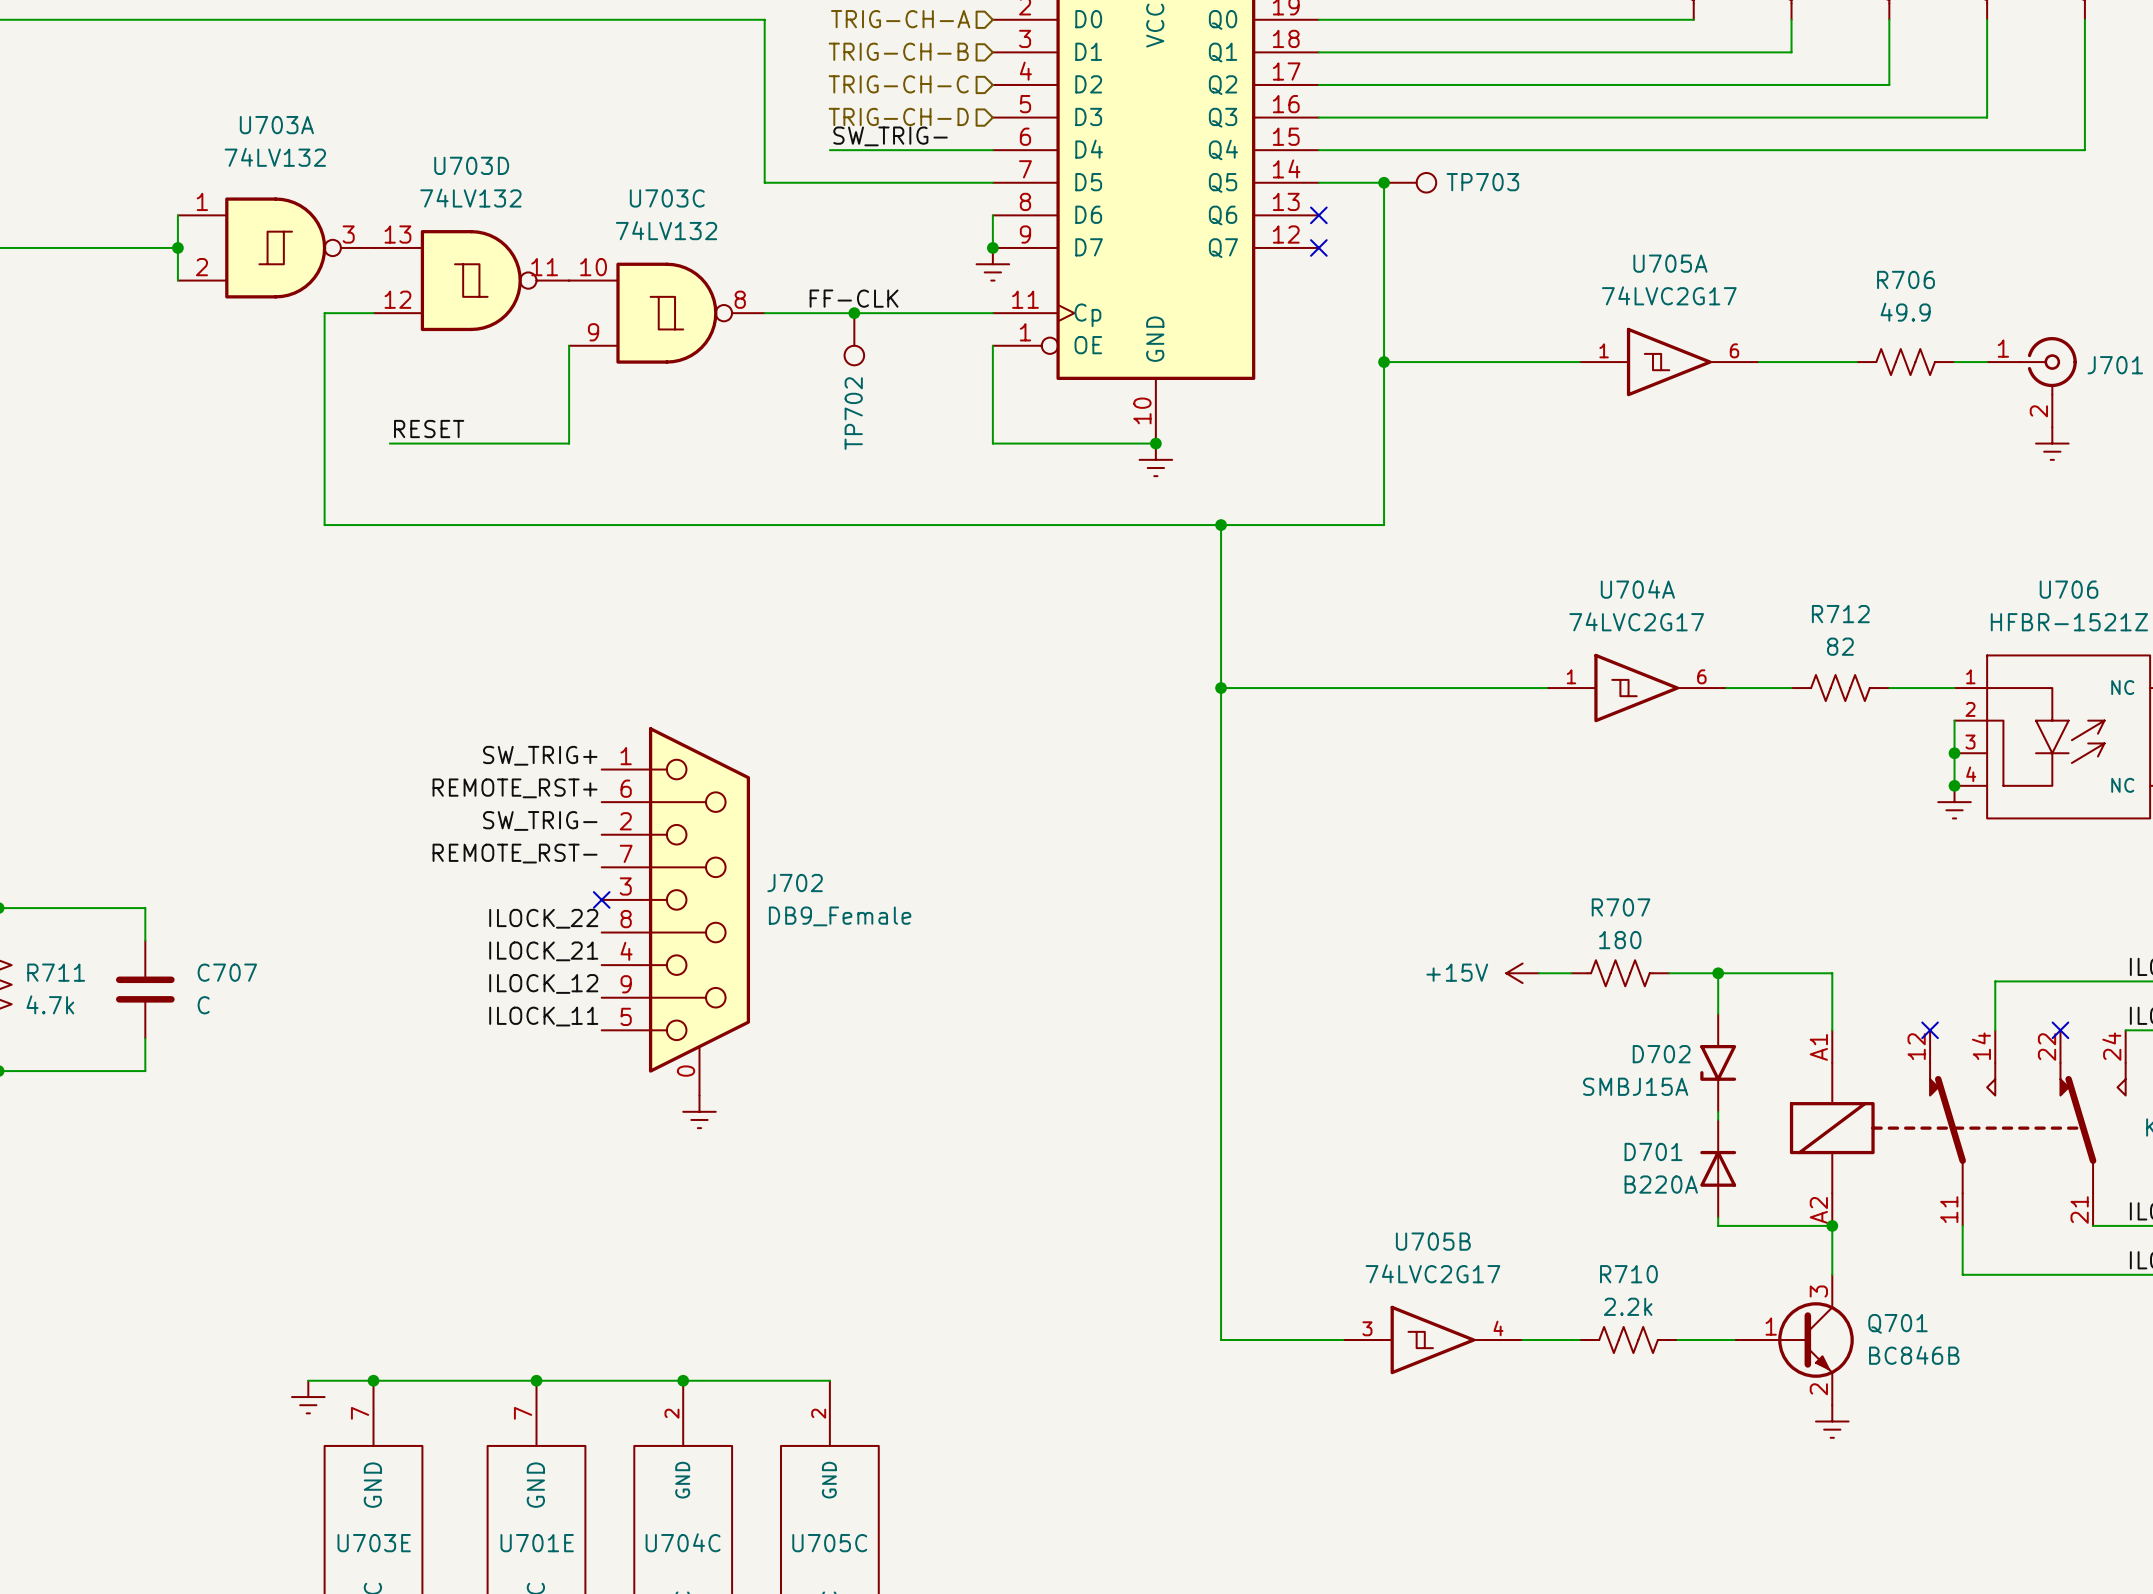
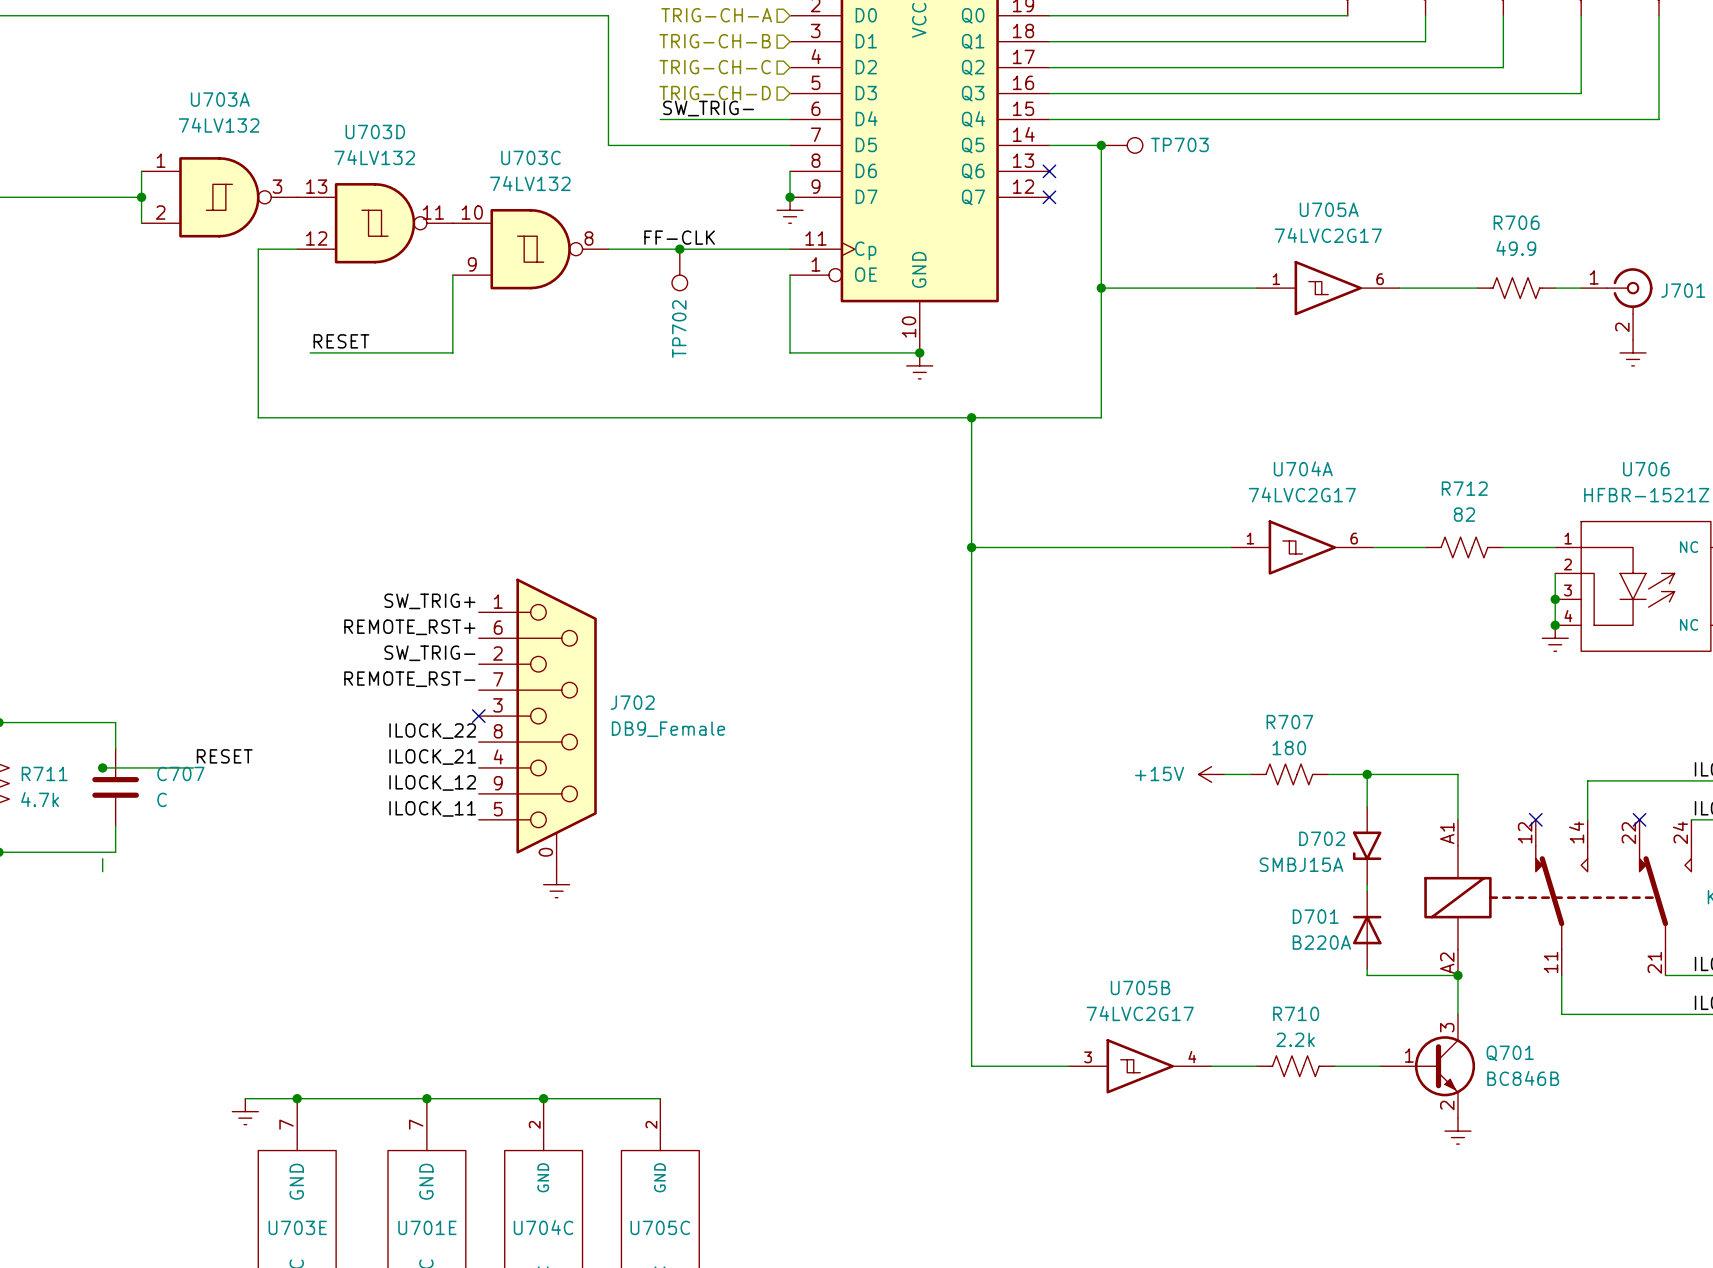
label: none -> RESET (224, 756)
wire: none -> (102, 767) (193, 767)
junction: none -> (102, 767)
wire: none -> (102, 858) (102, 871)

